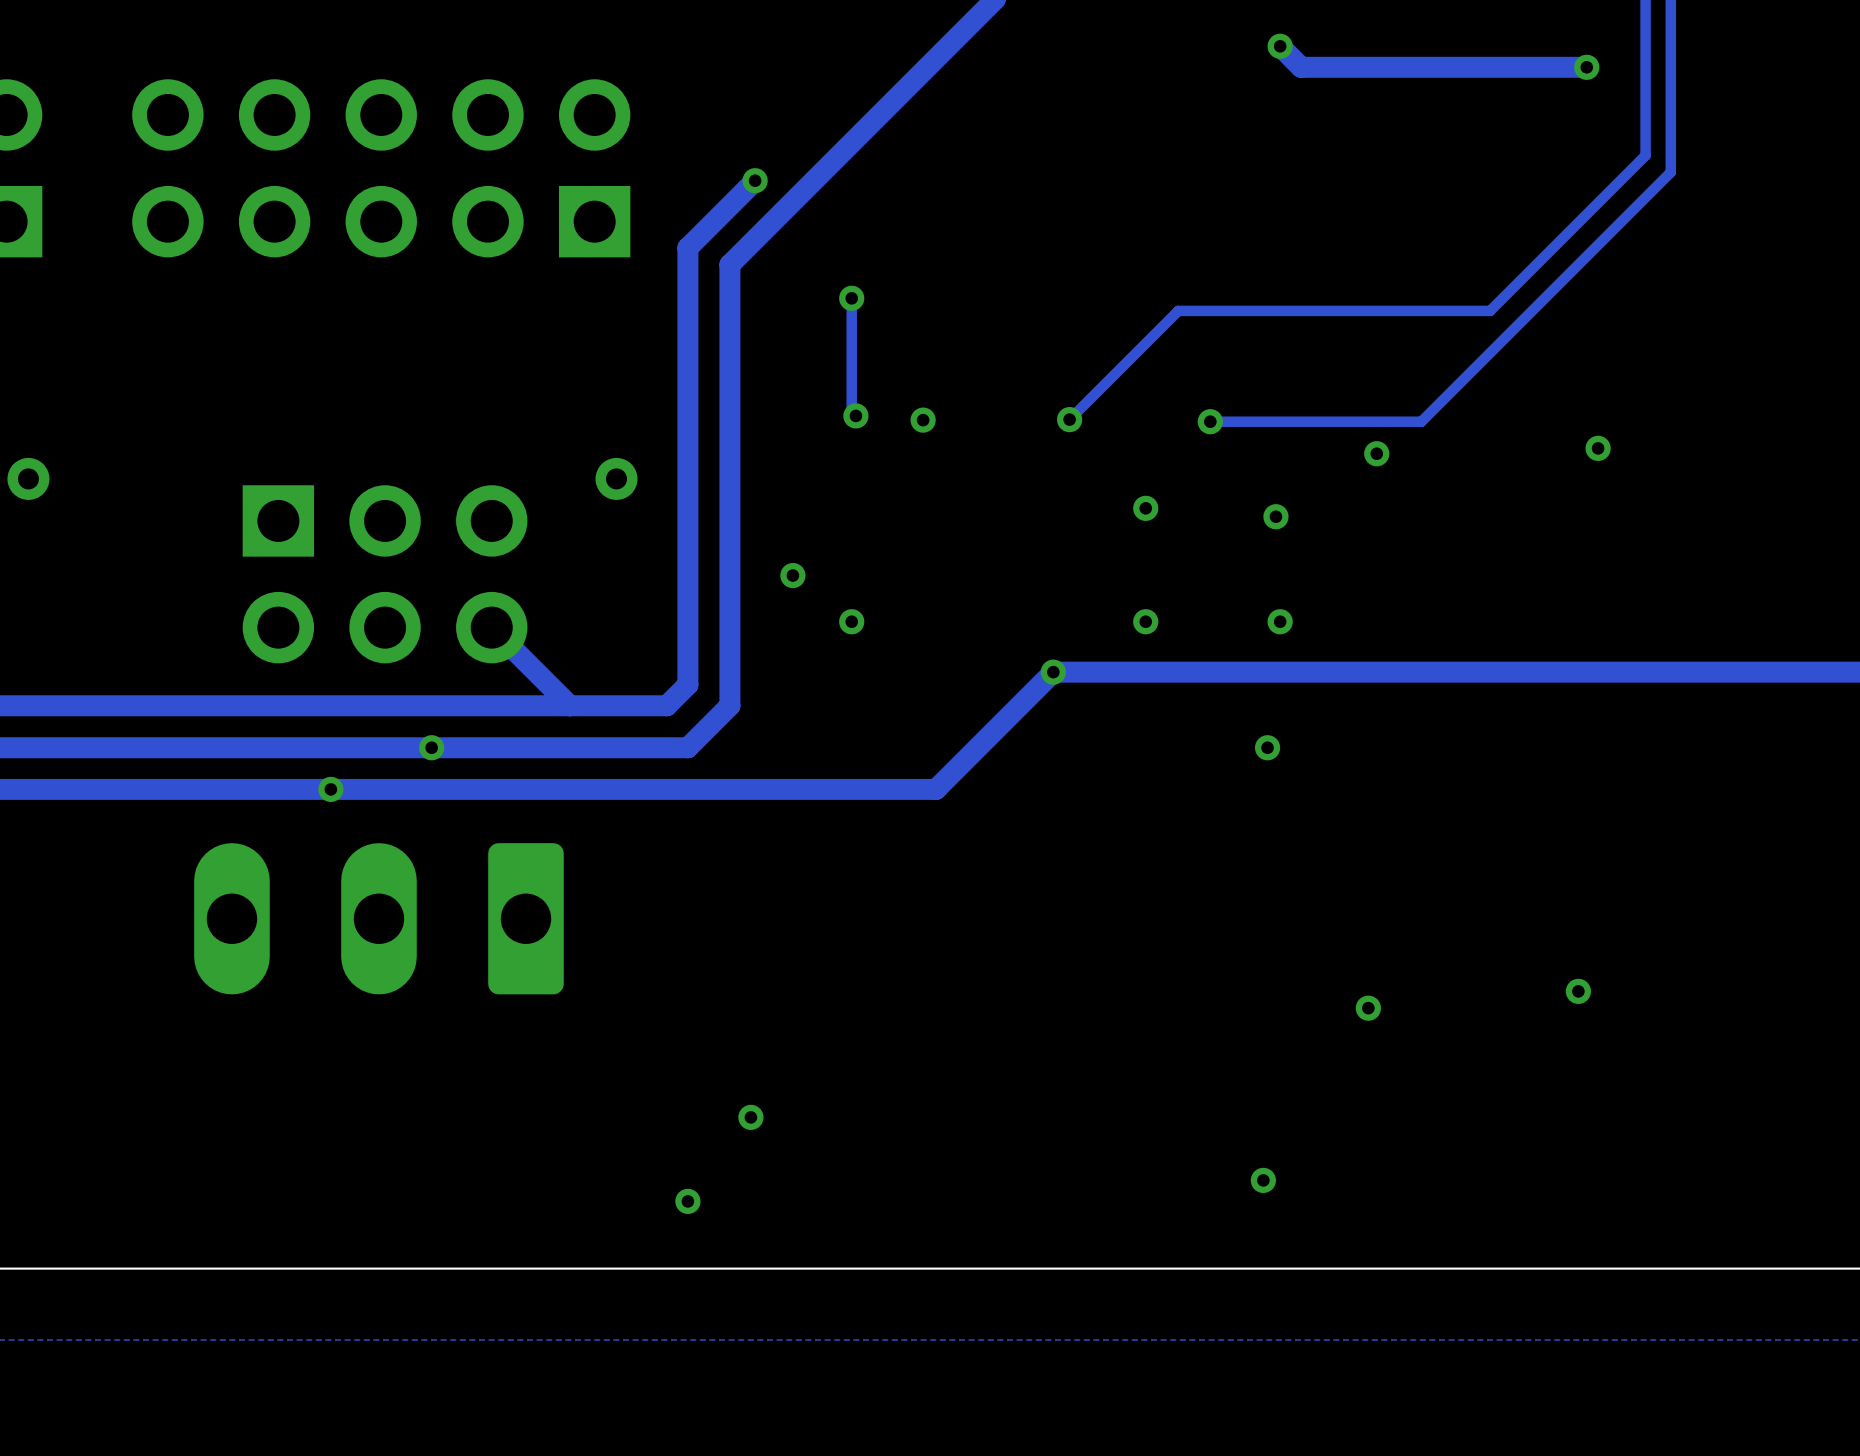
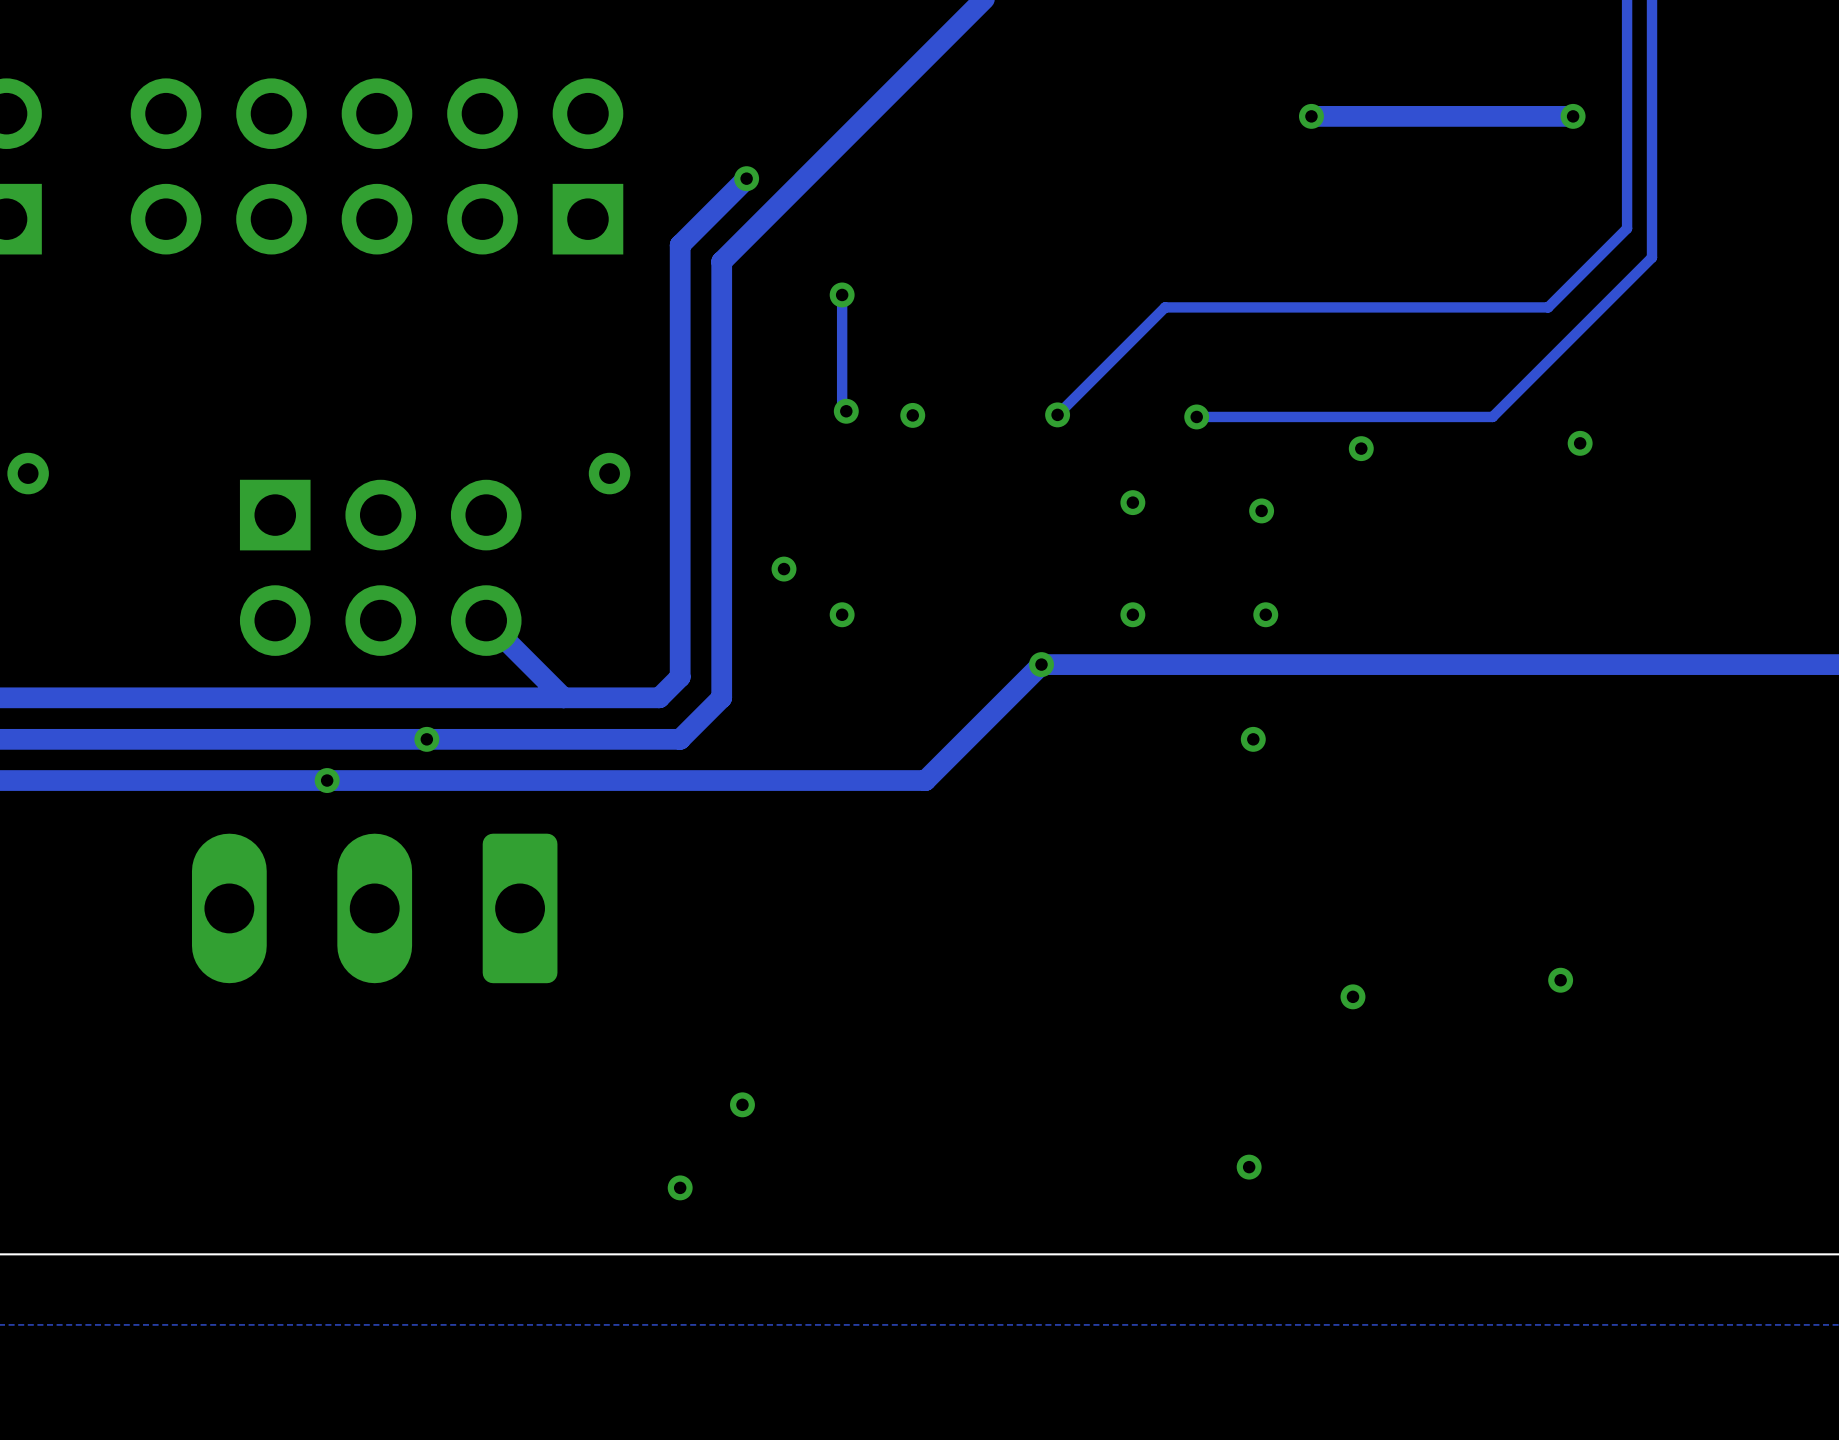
track: (1280, 46) (1301, 67) (1586, 67) -> none
via position: (1280, 46) -> (1311, 116)
via position: (1586, 67) -> (1573, 116)
track: none -> (1573, 116) (1311, 116)
track: (1645, 155) (1490, 310) -> (1627, 153) (1627, 228) (1548, 307) (1473, 307)
track: (1670, 172) (1421, 421) -> (1652, 170) (1652, 257) (1492, 416) (1405, 416)

